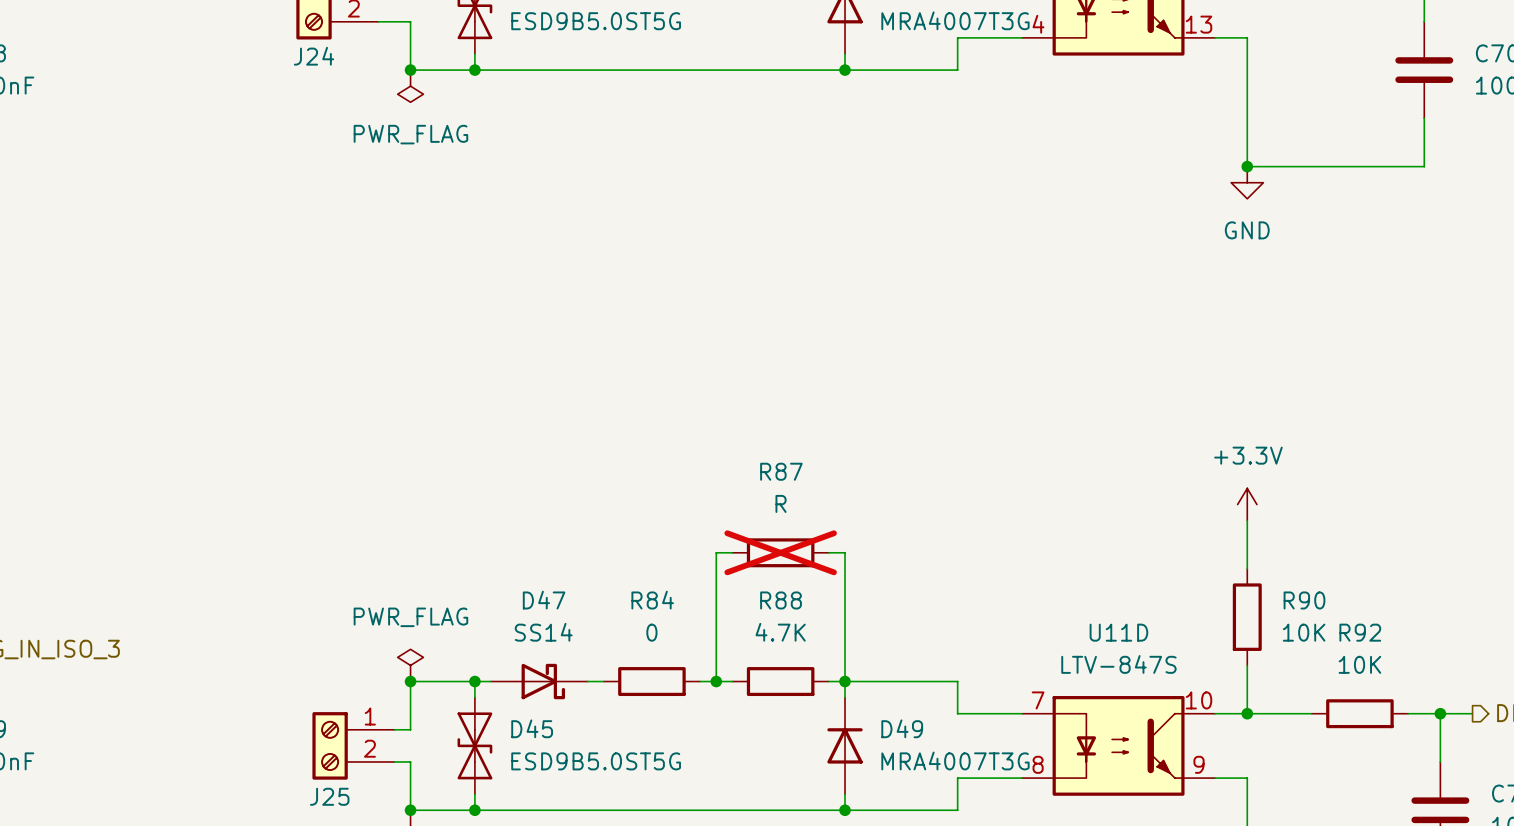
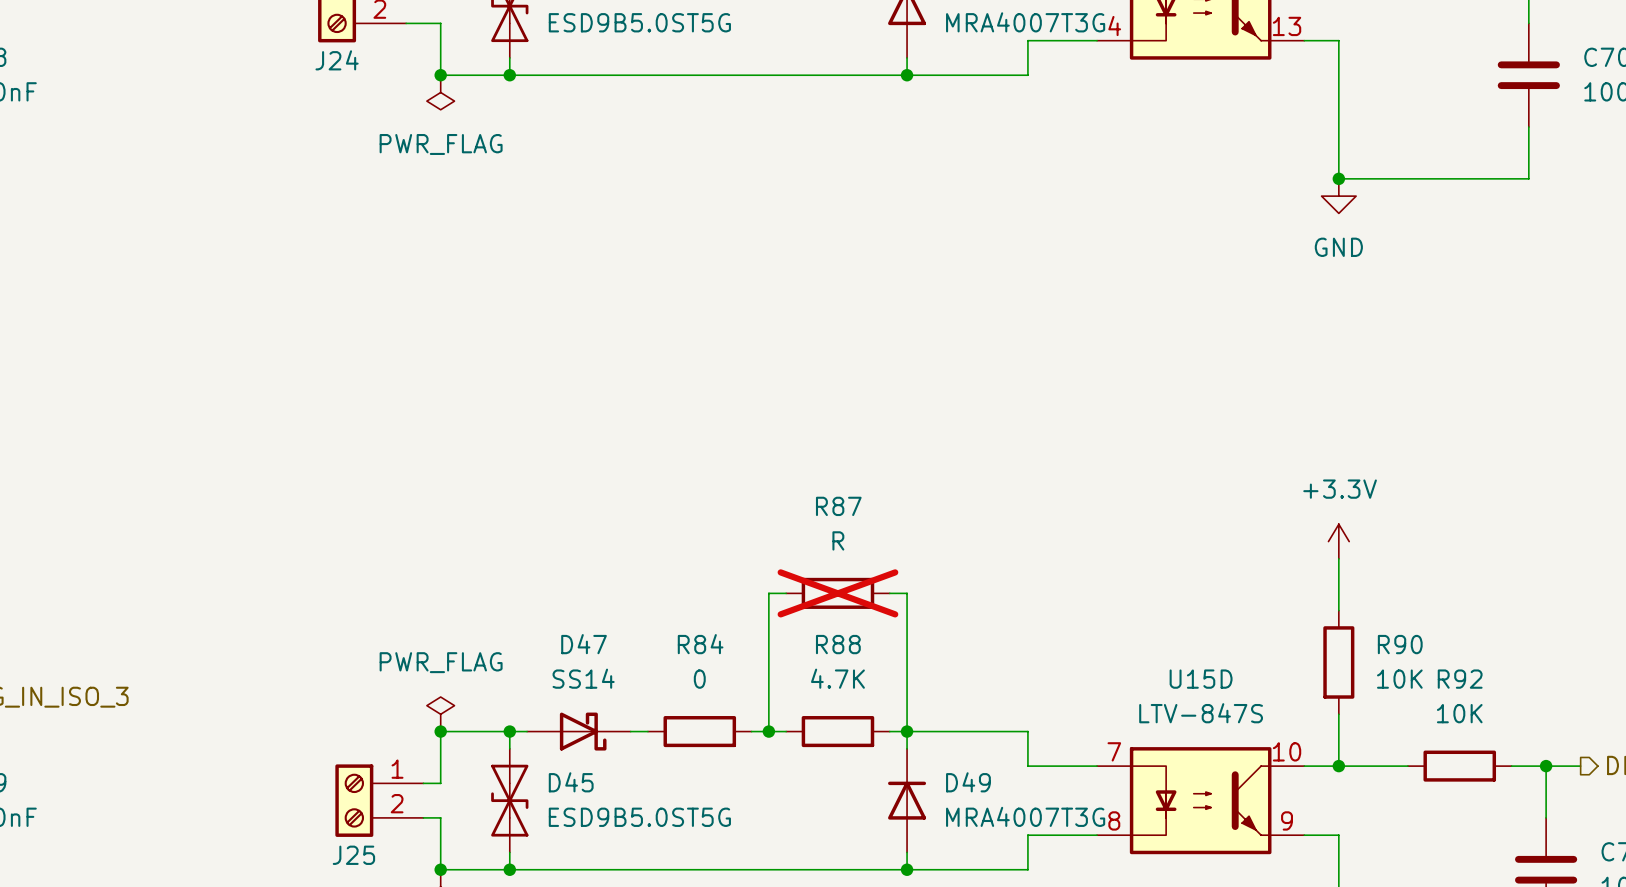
U11D name: U11D (1118, 632) -> U15D (1201, 679)

